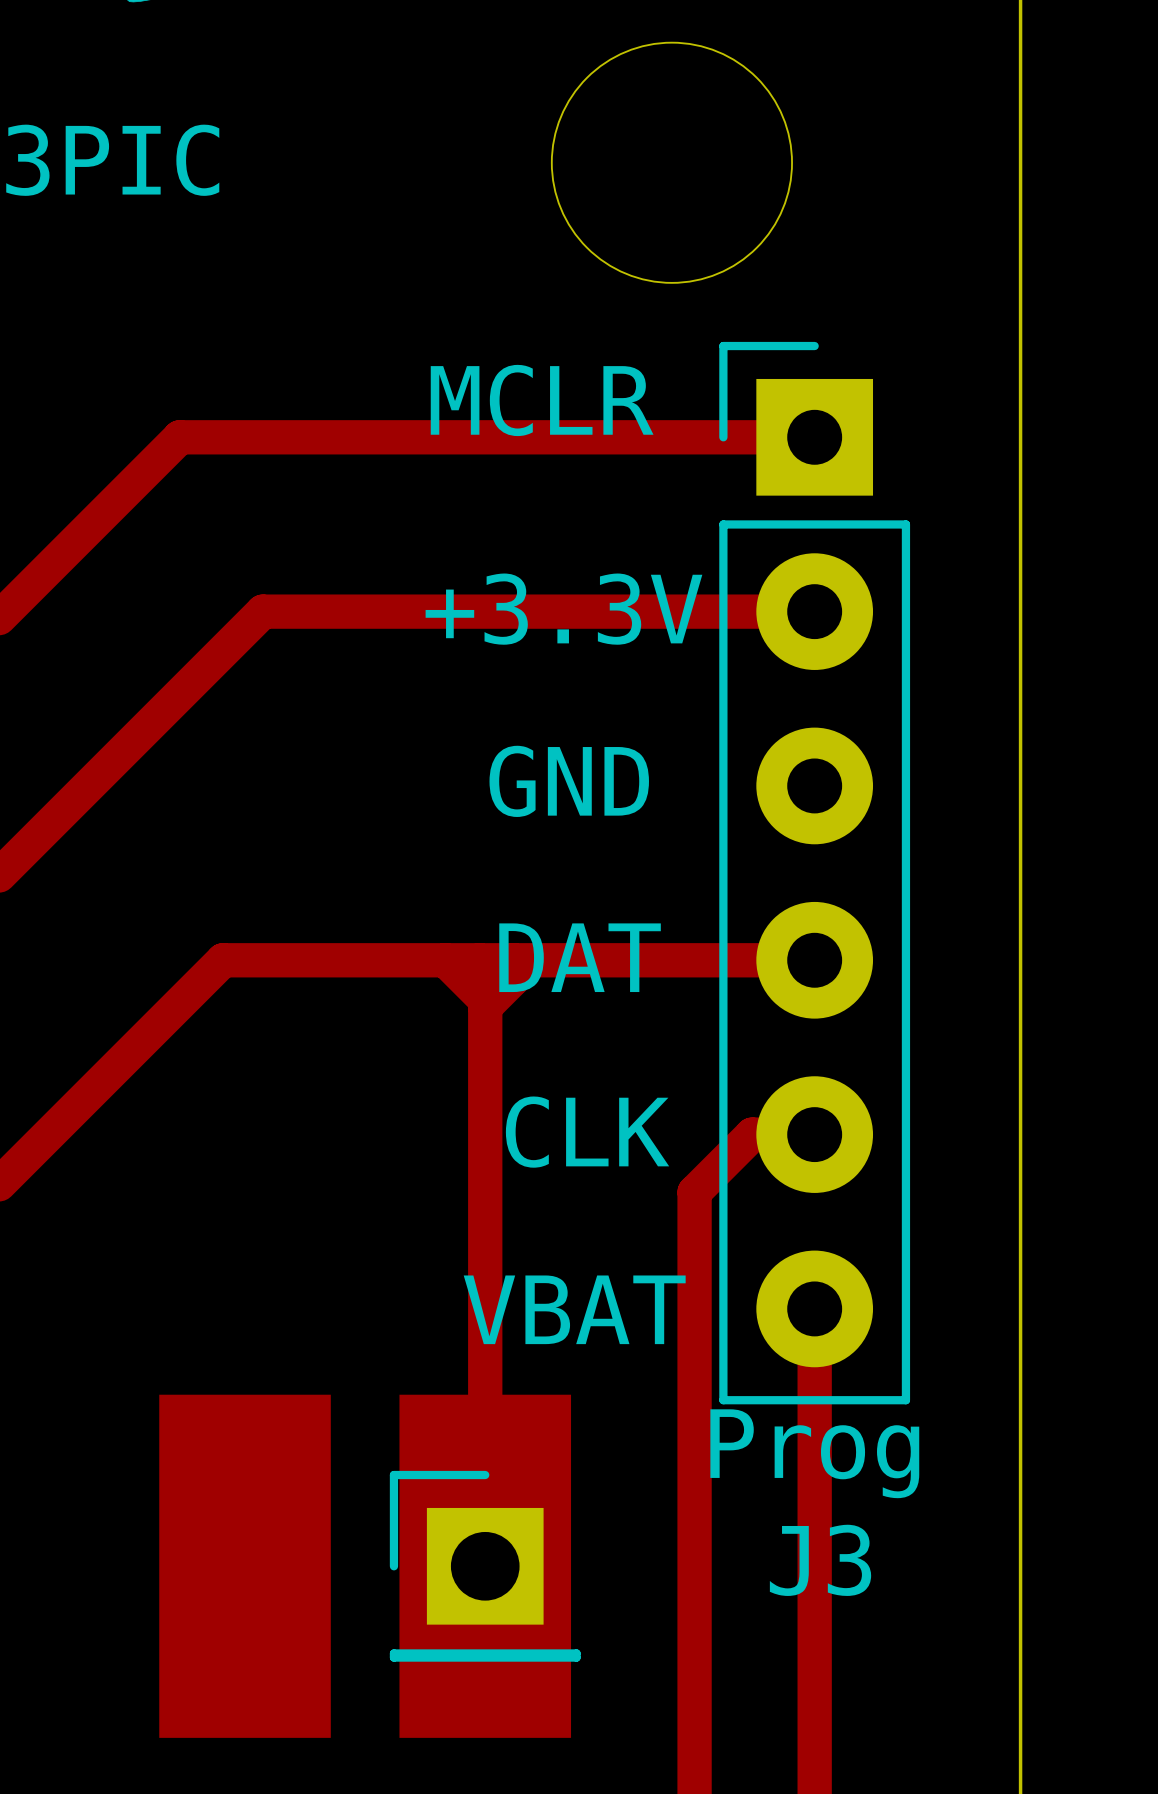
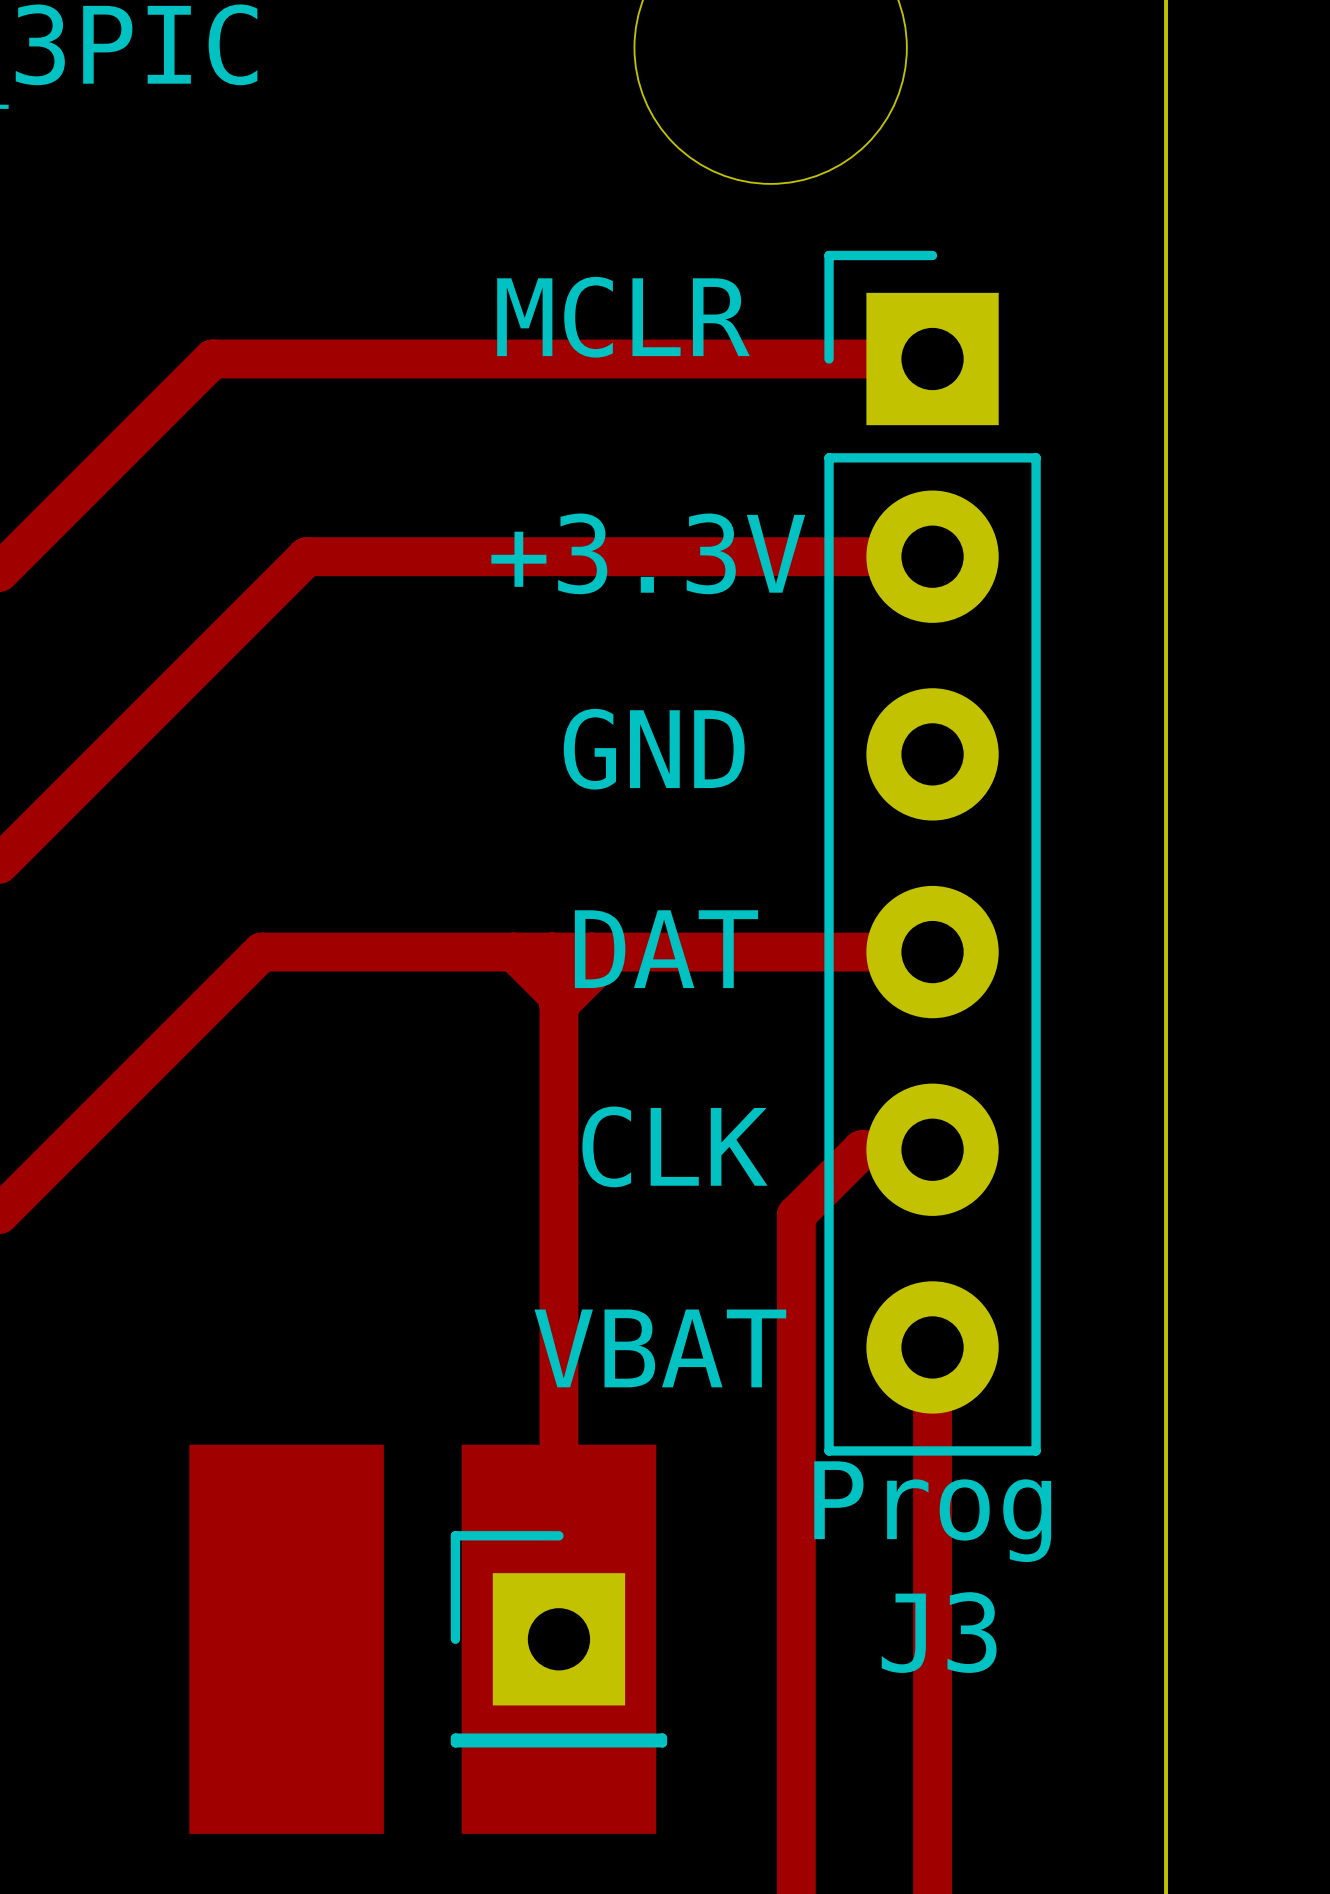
part footprint: [389, 1470, 581, 1662] -> [450, 1531, 668, 1748]

